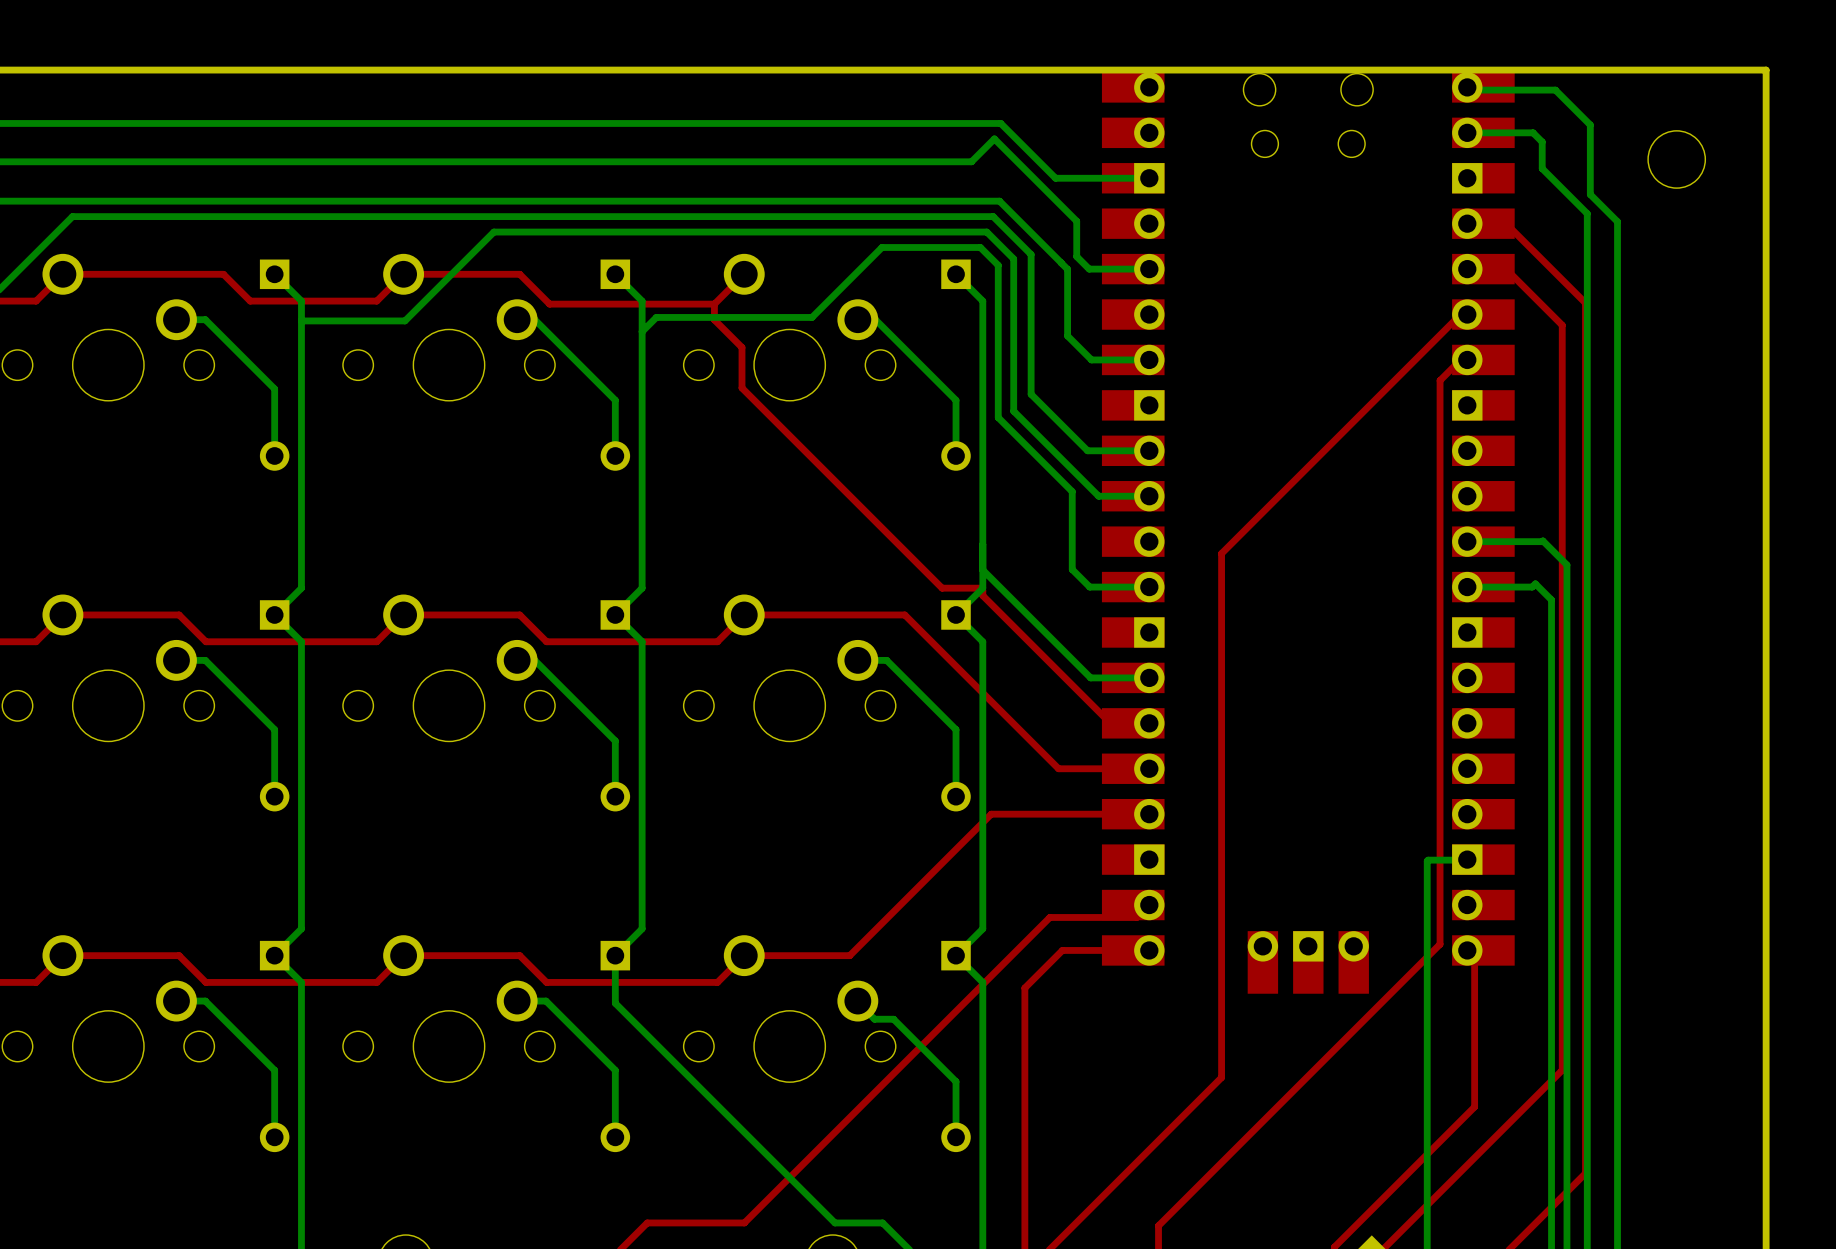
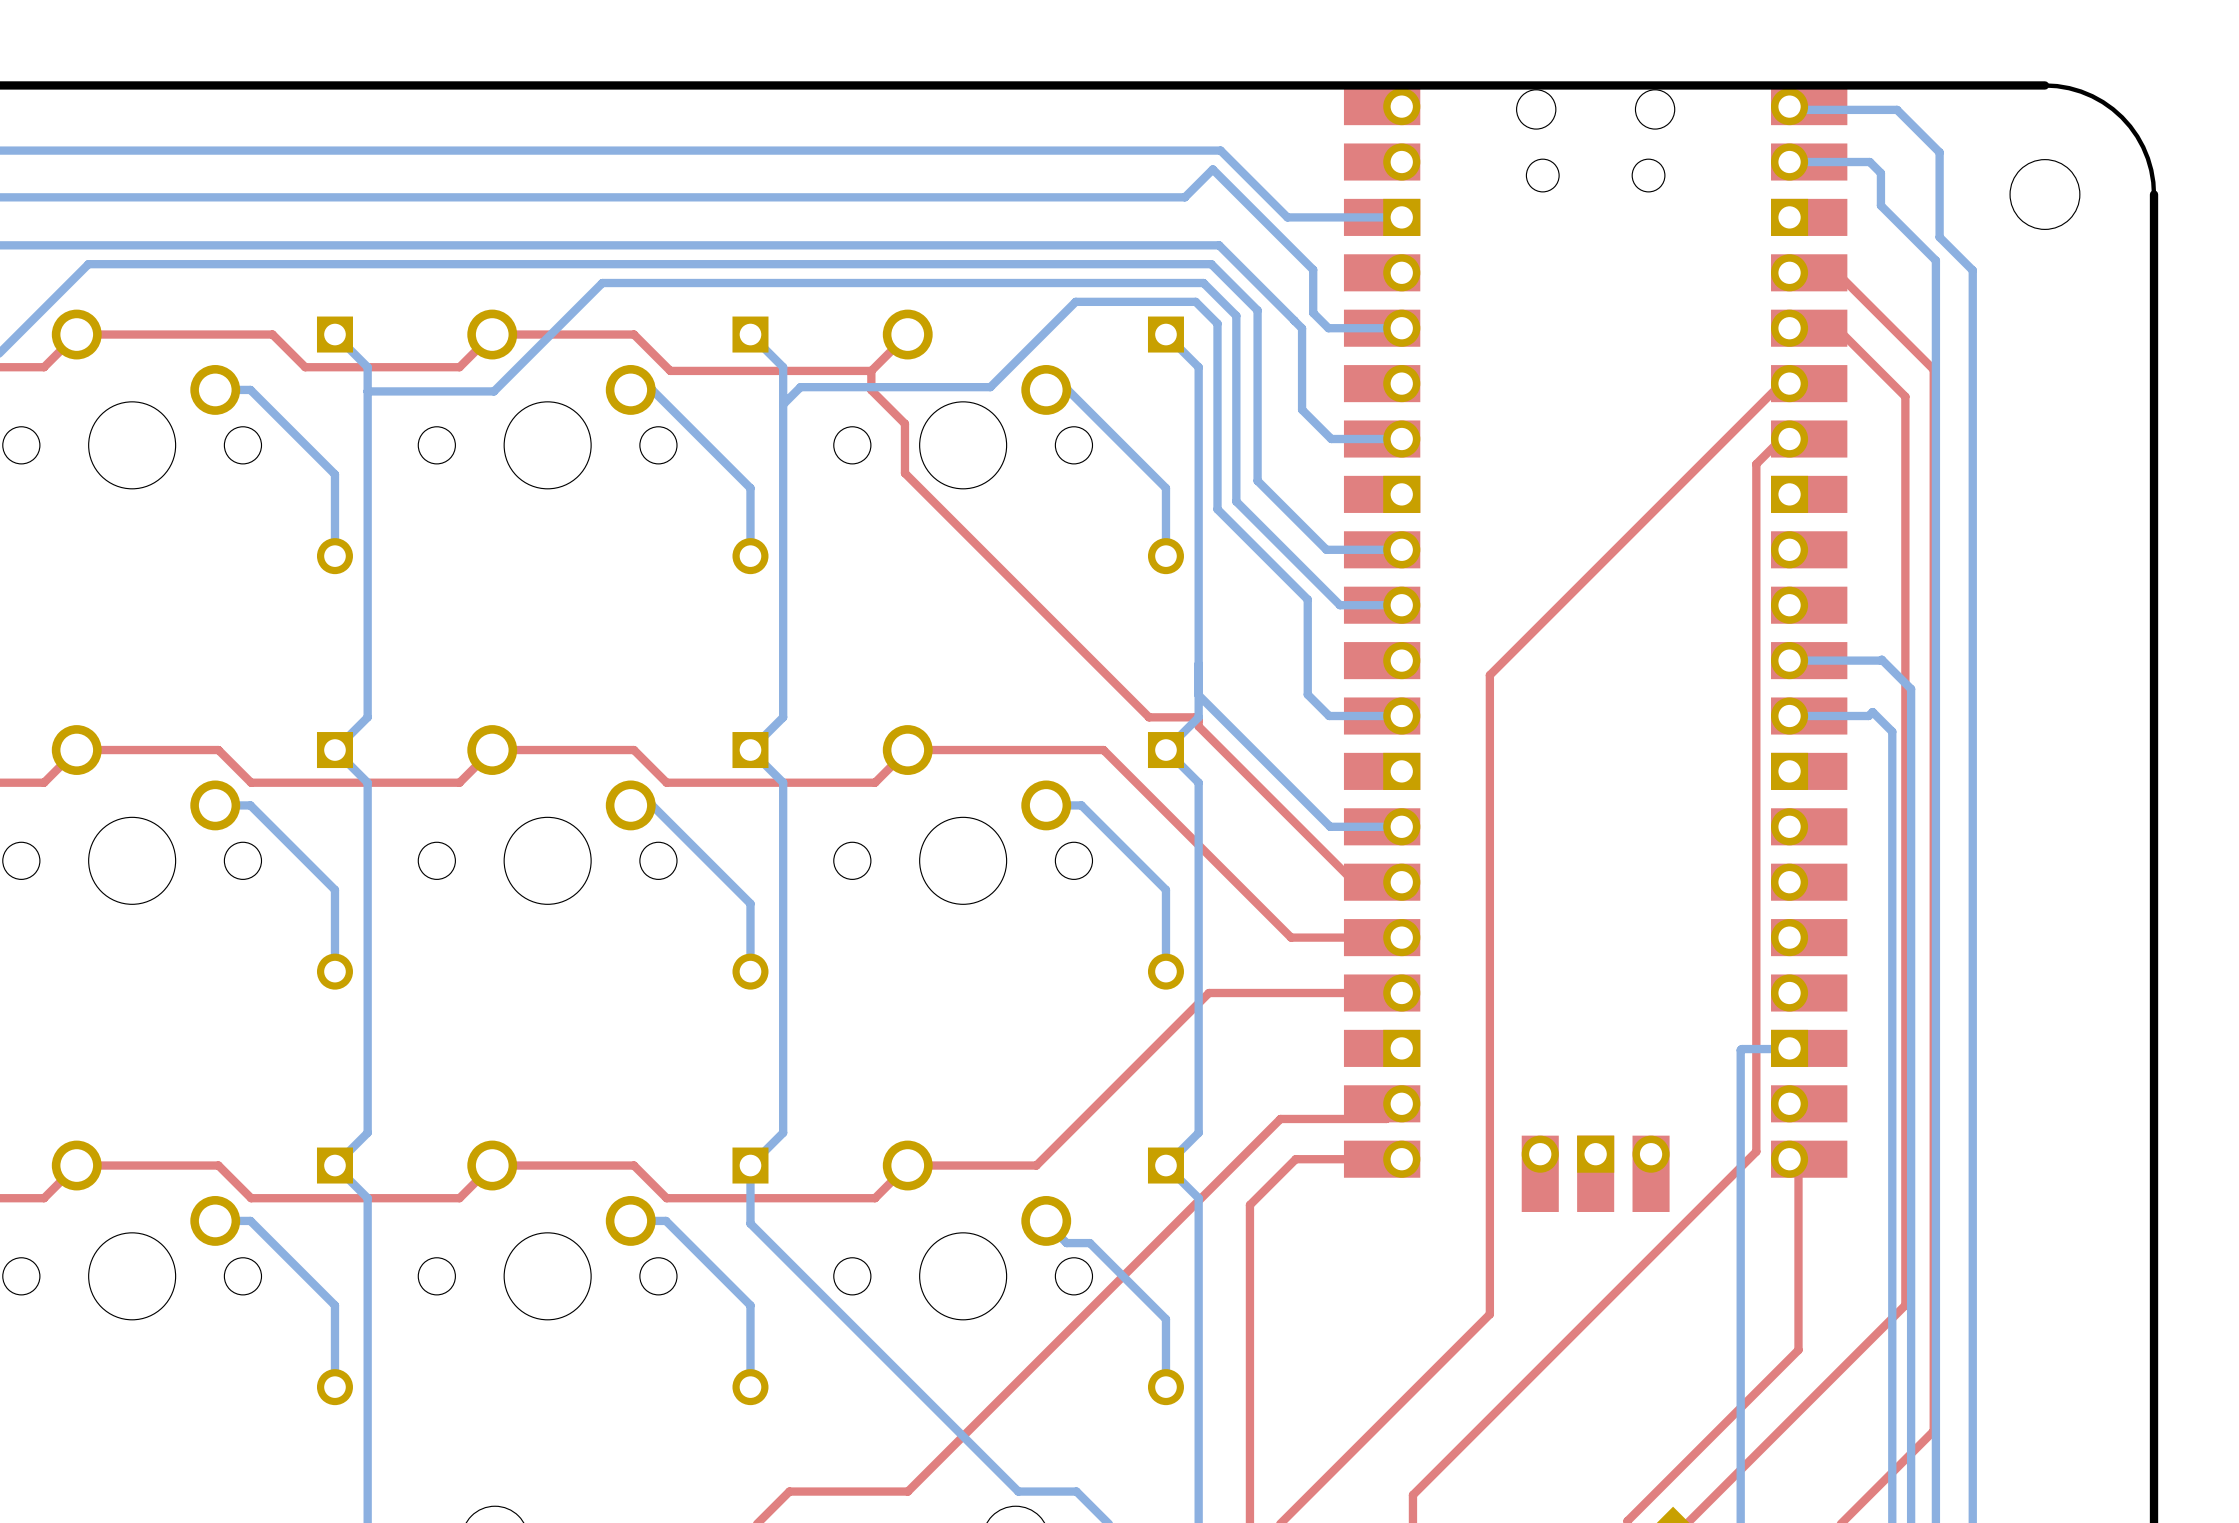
board edge: (1676, 70) (1766, 70) (1766, 159) -> (2044, 85) (2080, 91) (2102, 102) (2122, 117) (2137, 136) (2147, 158) (2154, 194)

